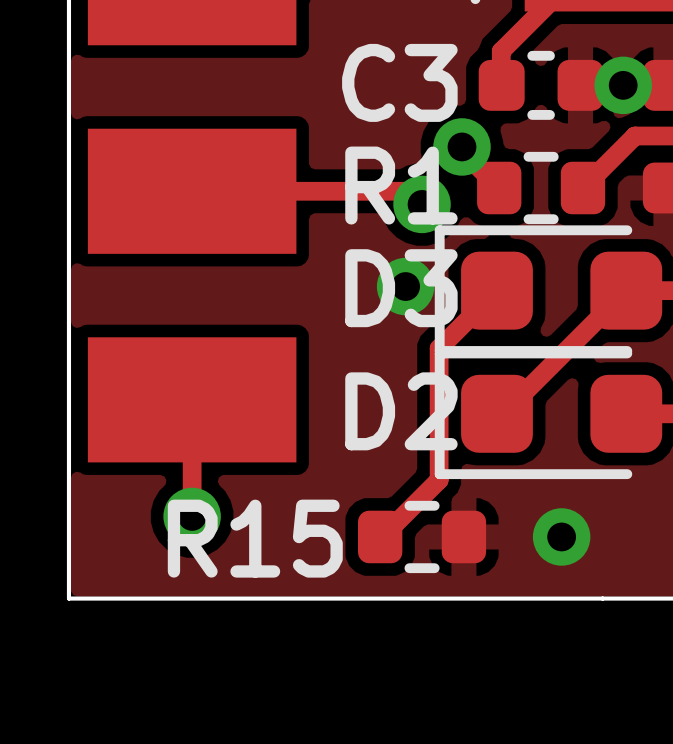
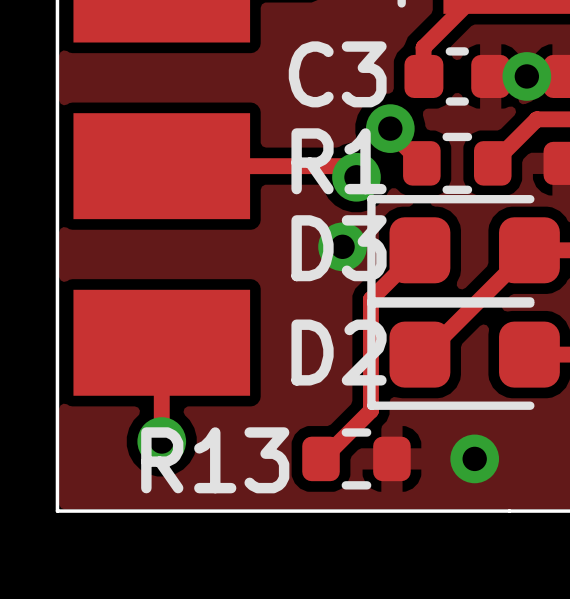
R15 name: R15 (255, 538) -> R13 (215, 460)

